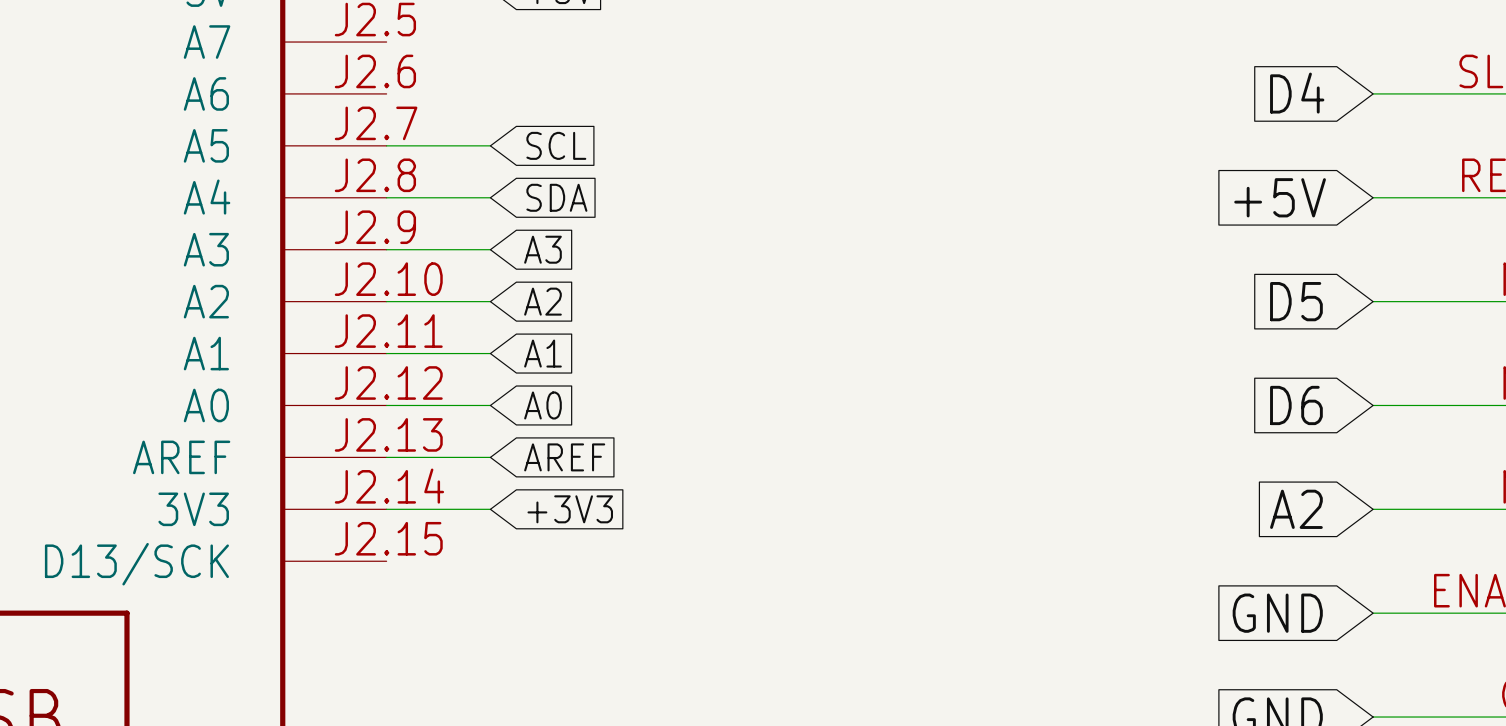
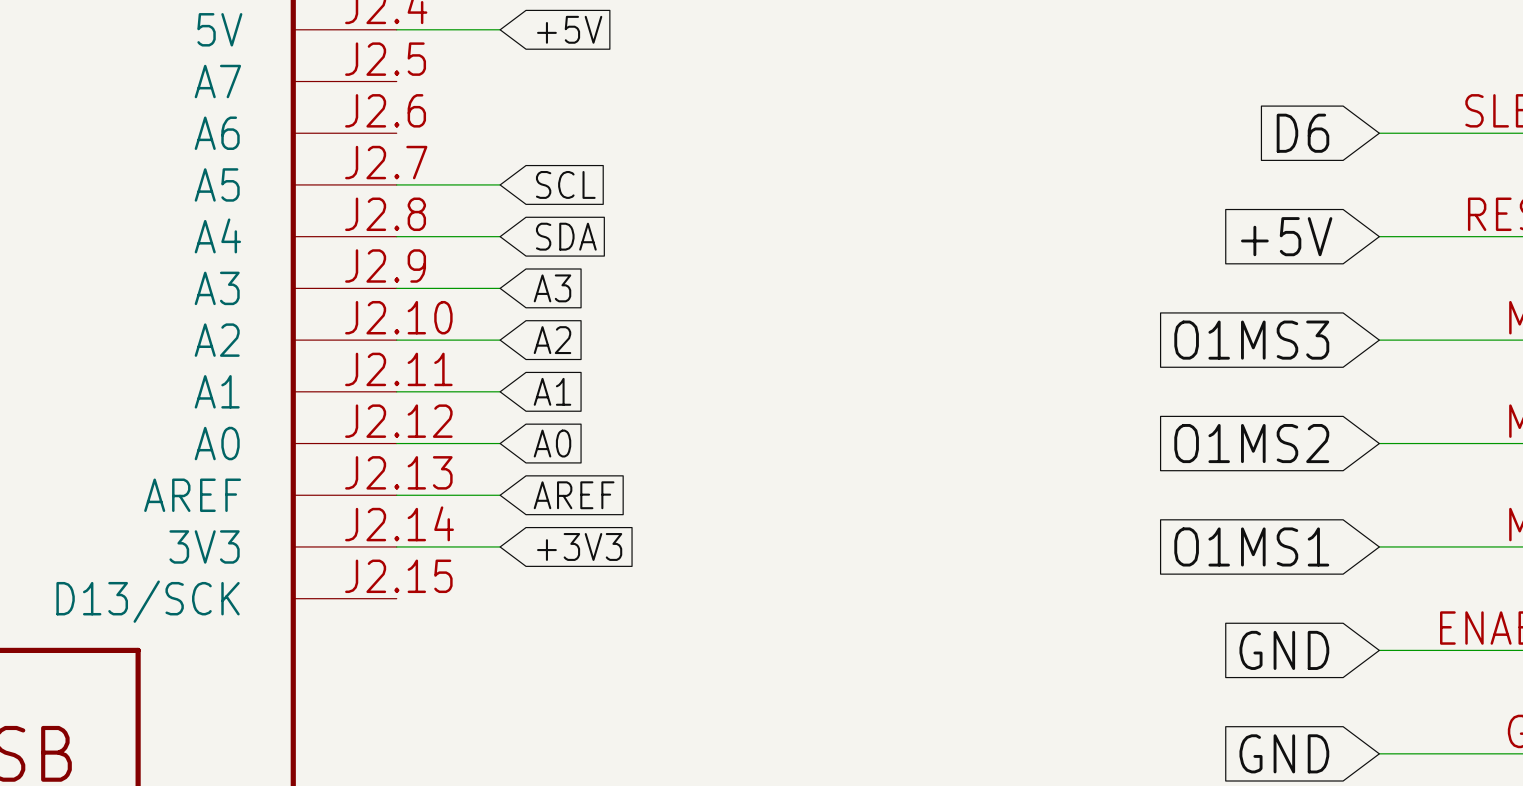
global label: D4 (1297, 93) -> D6 (1302, 133)
global label: D5 (1296, 301) -> O1MS3 (1251, 340)
global label: D6 (1296, 405) -> O1MS2 (1251, 443)
global label: A2 (1296, 509) -> O1MS1 (1251, 546)

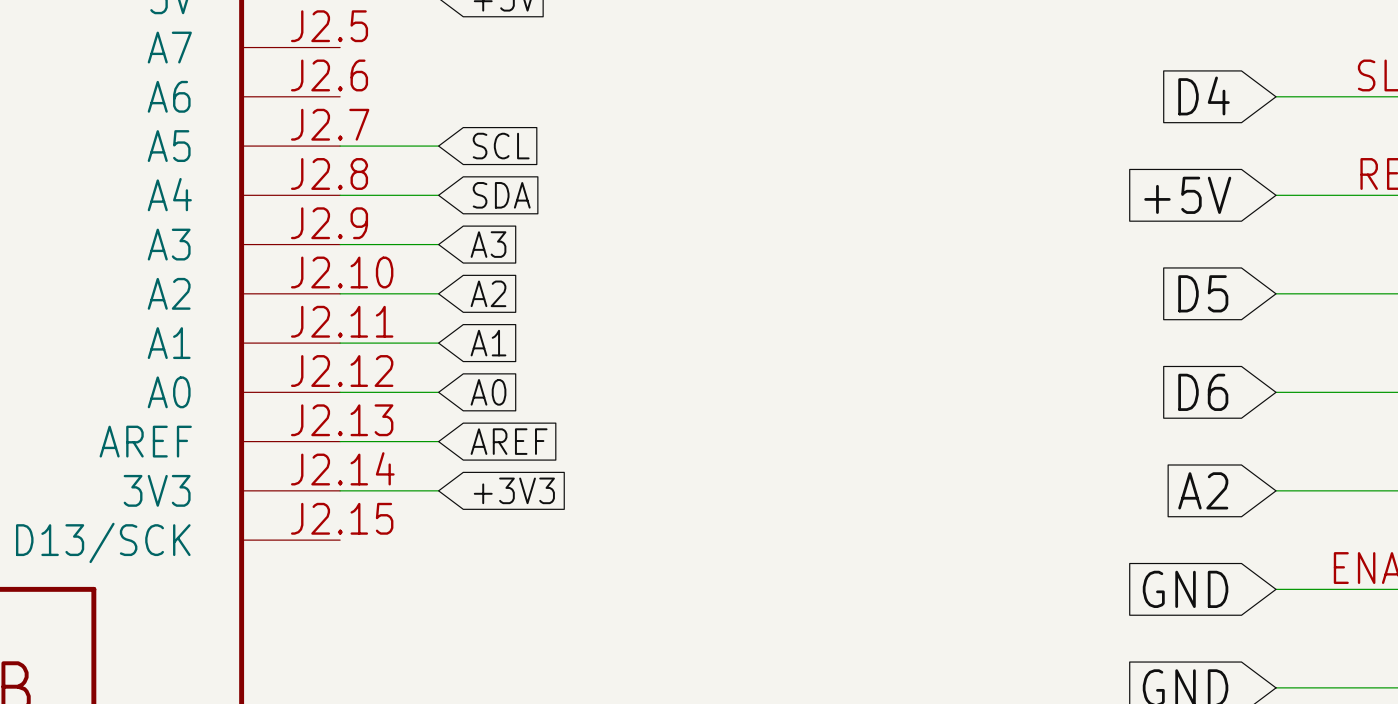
global label: D6 (1302, 133) -> D4 (1204, 95)
global label: O1MS3 (1251, 340) -> D5 (1203, 293)
global label: O1MS2 (1251, 443) -> D6 (1203, 392)
global label: O1MS1 (1251, 546) -> A2 (1203, 490)

